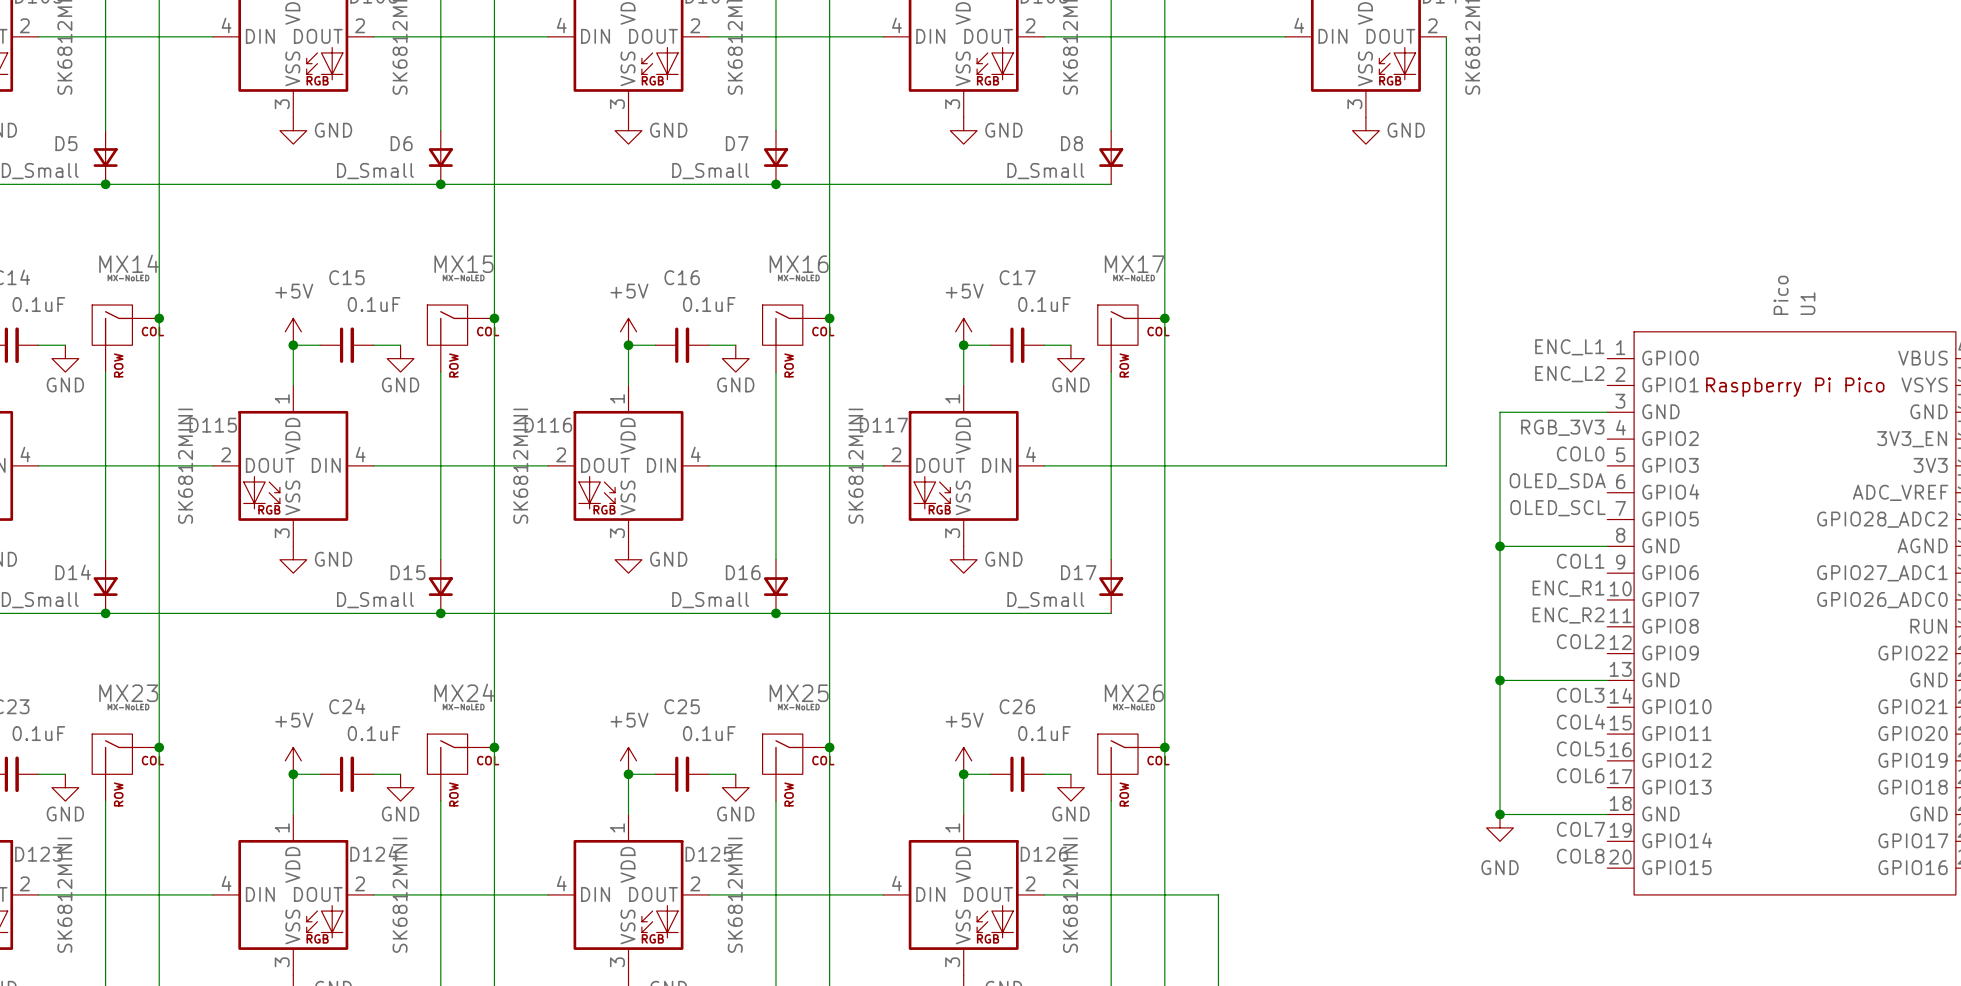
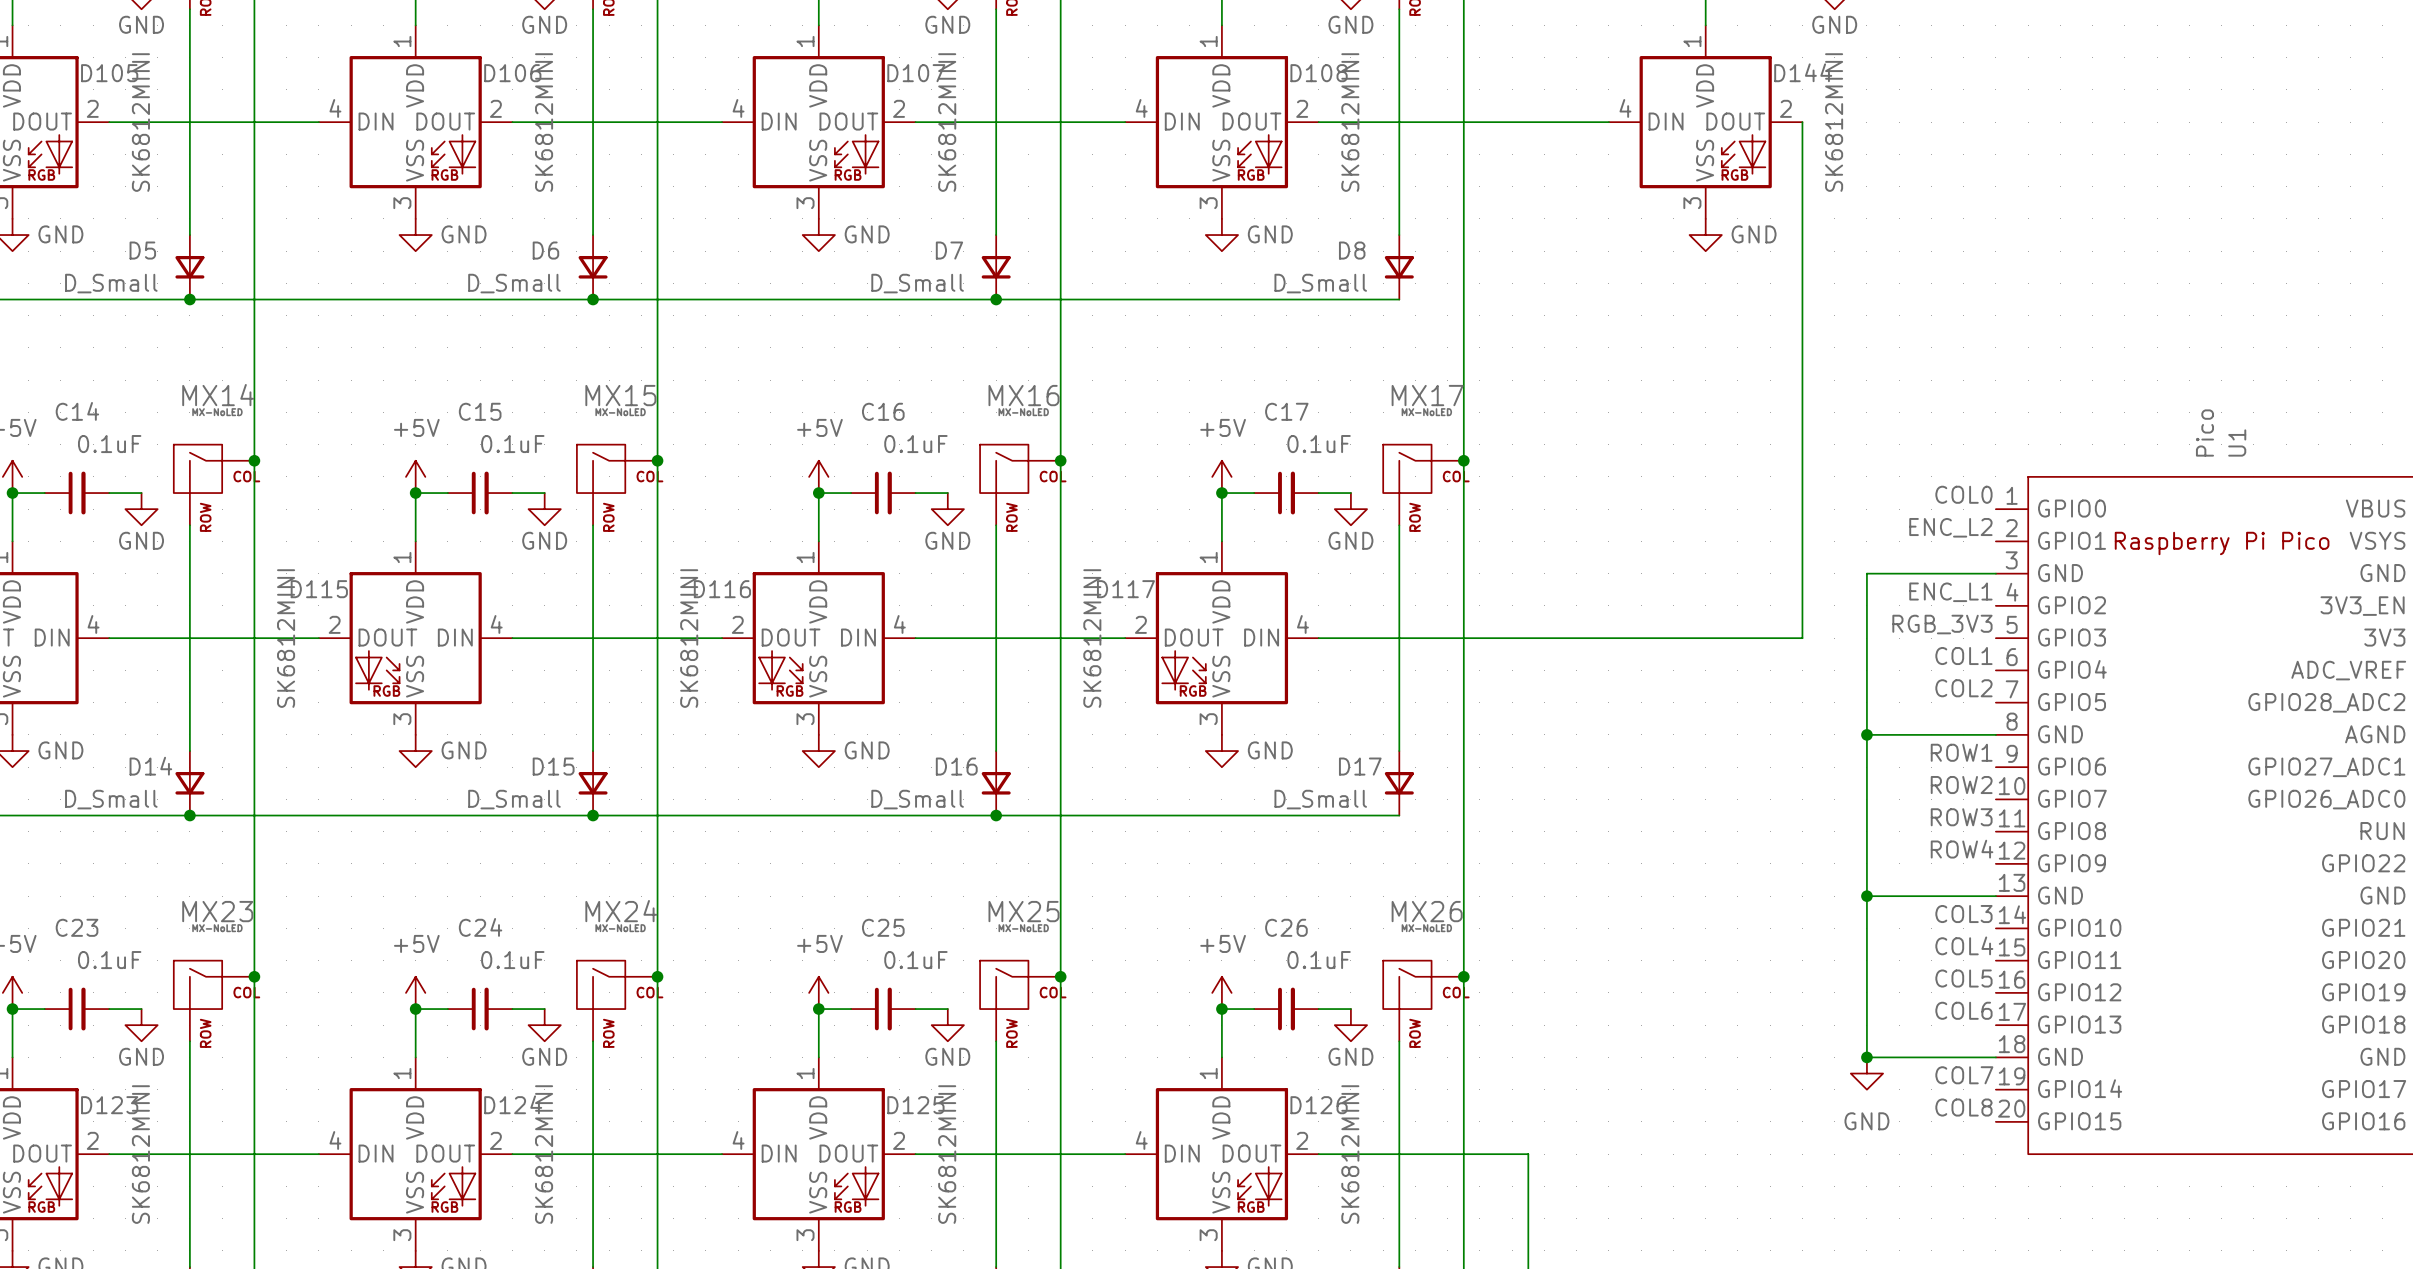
label: ENC_L1 (1569, 347) -> COL0 (1963, 494)
label: RGB_3V3 (1562, 427) -> ENC_L1 (1950, 592)
label: COL0 (1580, 453) -> RGB_3V3 (1942, 624)
label: OLED_SDA (1557, 481) -> COL1 (1963, 656)
label: OLED_SCL (1558, 508) -> COL2 (1963, 688)
label: COL1 (1580, 561) -> ROW1 (1961, 752)
label: ENC_R1 (1568, 588) -> ROW2 (1961, 785)
label: ENC_R2 (1568, 615) -> ROW3 (1961, 817)
label: COL2 (1580, 641) -> ROW4 (1962, 849)

